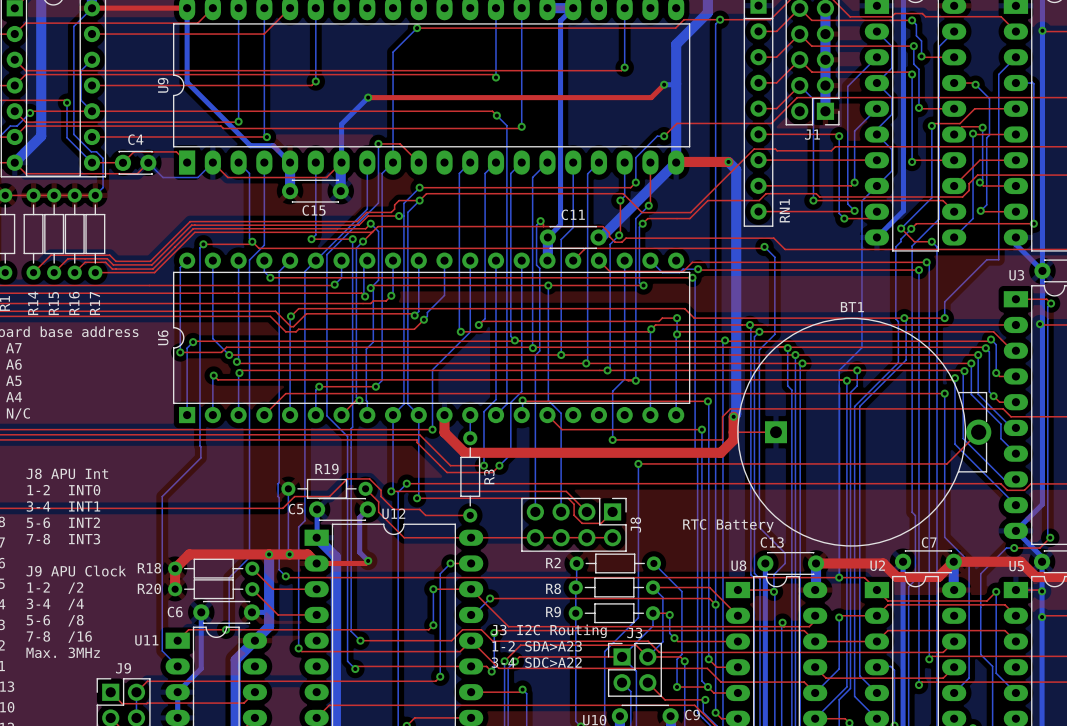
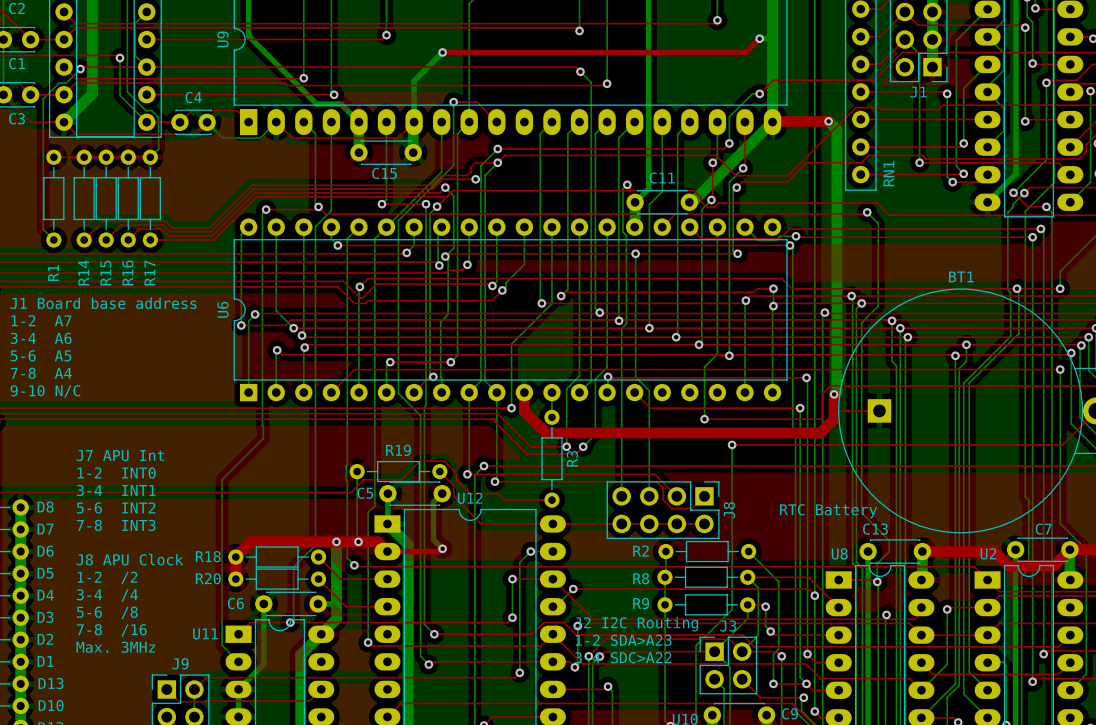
bottom track: (876, 185) (861, 200) (861, 347) (839, 370) (839, 577) -> none
text: J8 APU Int (67, 473) -> J7 APU Int (120, 455)
text: J9 APU Clock (76, 571) -> J8 APU Clock (129, 559)
via: (839, 577) -> none
text: J3 I2C Routing (549, 631) -> J2 I2C Routing (636, 624)

